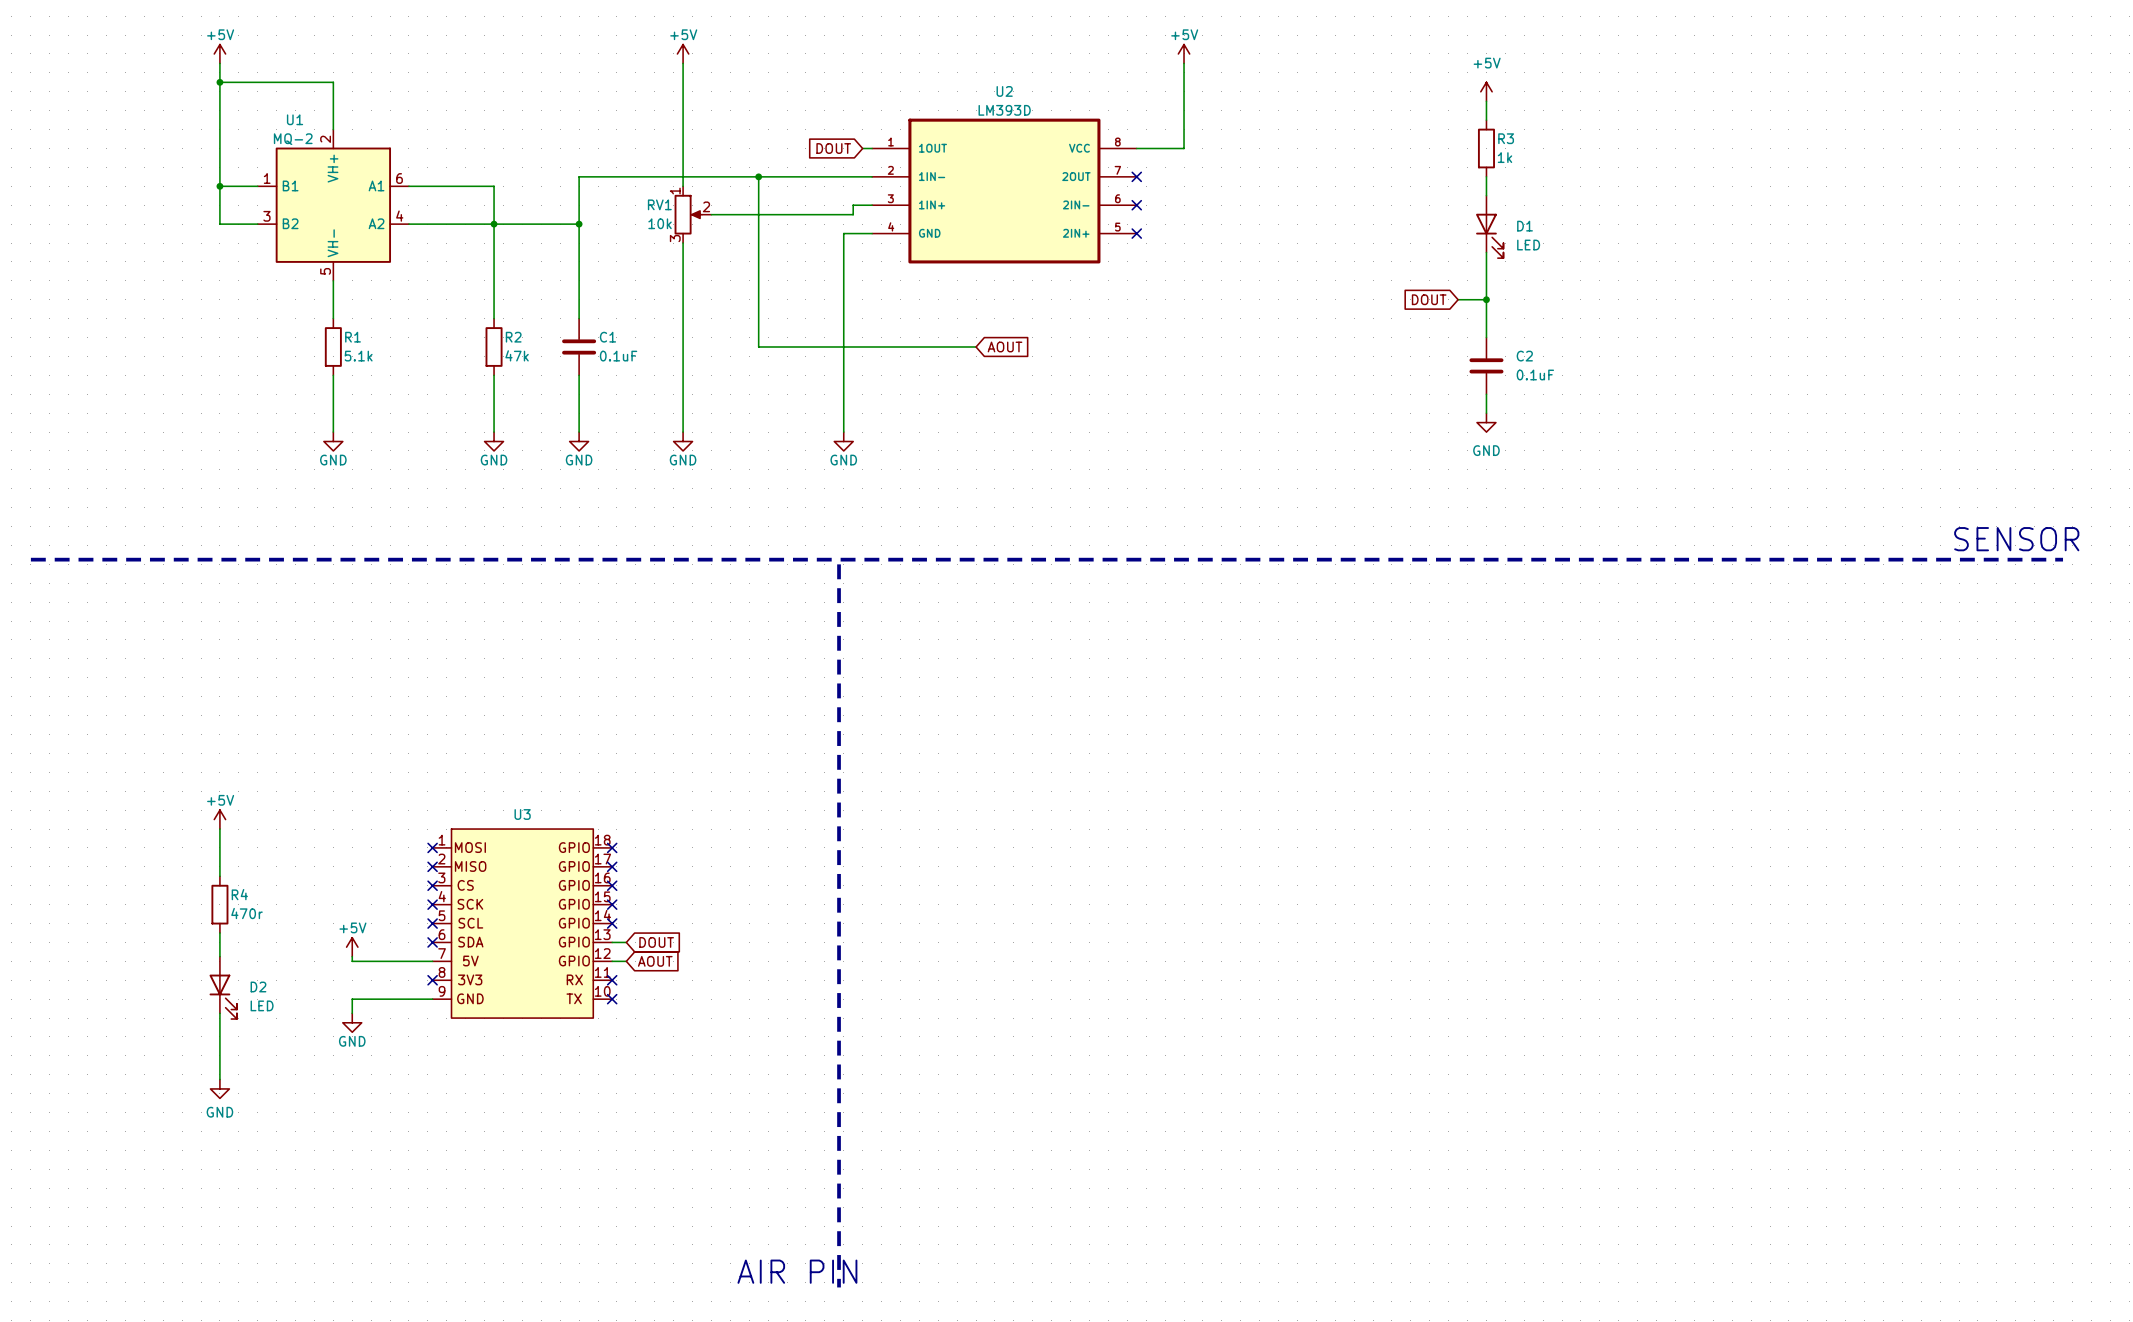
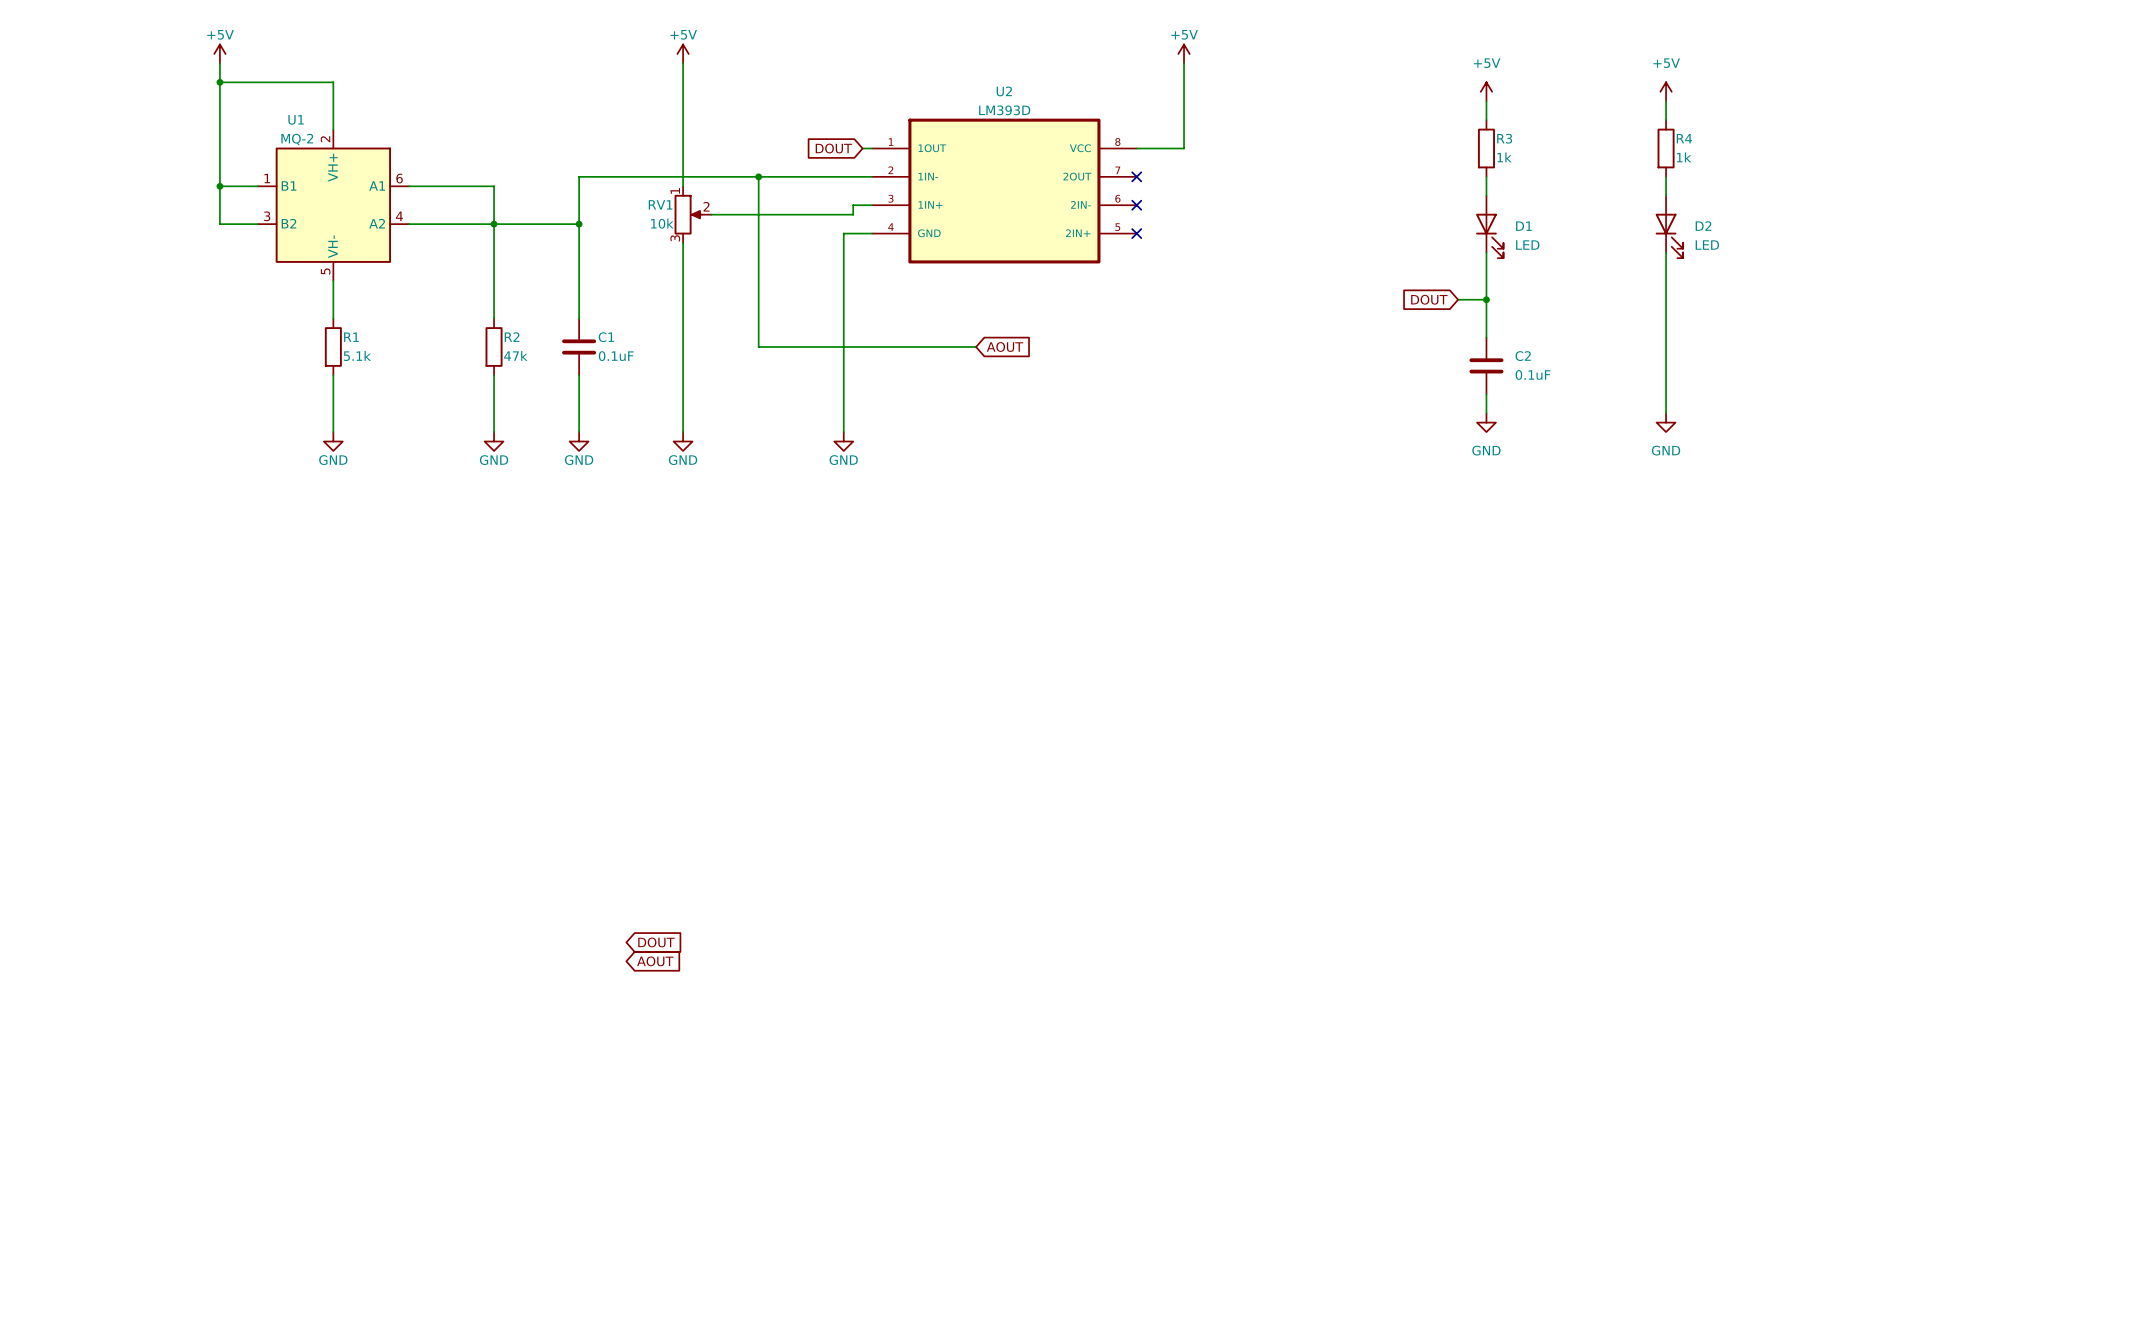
power symbol: none -> +5V (1666, 91)
wire: none -> (1666, 101) (1666, 120)
wire: none -> (1666, 176) (1666, 195)
wire: none -> (1666, 252) (1666, 413)
power symbol: none -> GND (1666, 422)
text: SENSOR (2016, 539) -> none
line: (30, 559) (2063, 559) -> none
line: (839, 564) (839, 1287) -> none
power symbol: +5V (219, 819) -> none
wire: (219, 829) (219, 876) -> none
no-connect mark: (432, 847) -> none
no-connect mark: (612, 847) -> none
no-connect mark: (432, 866) -> none
no-connect mark: (612, 866) -> none
no-connect mark: (432, 885) -> none
no-connect mark: (612, 885) -> none
R4 position: (219, 904) -> (1666, 148)
no-connect mark: (432, 904) -> none
no-connect mark: (612, 904) -> none
R4 value: 470r (247, 913) -> 1k (1684, 157)
no-connect mark: (432, 923) -> none
U3: (522, 923) -> none
no-connect mark: (612, 923) -> none
wire: (219, 933) (219, 956) -> none
no-connect mark: (432, 942) -> none
wire: (612, 942) (626, 942) -> none
power symbol: +5V (352, 947) -> none
wire: (352, 956) (352, 961) (432, 961) -> none
wire: (612, 961) (626, 961) -> none
no-connect mark: (432, 980) -> none
no-connect mark: (612, 980) -> none
D2 position: (223, 987) -> (1669, 226)
wire: (432, 999) (352, 999) (352, 1013) -> none
no-connect mark: (612, 999) -> none
wire: (219, 1013) (219, 1079) -> none
power symbol: GND (352, 1022) -> none
power symbol: GND (219, 1088) -> none
text: AIR PIN (797, 1271) -> none

